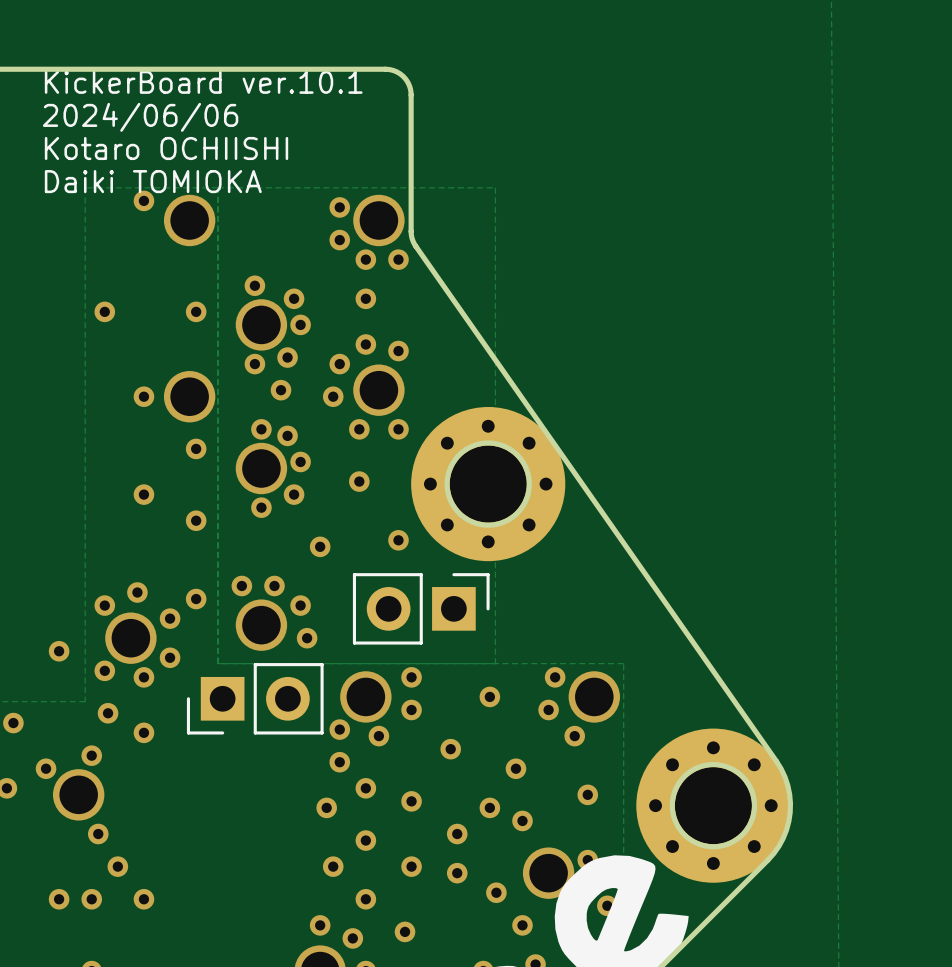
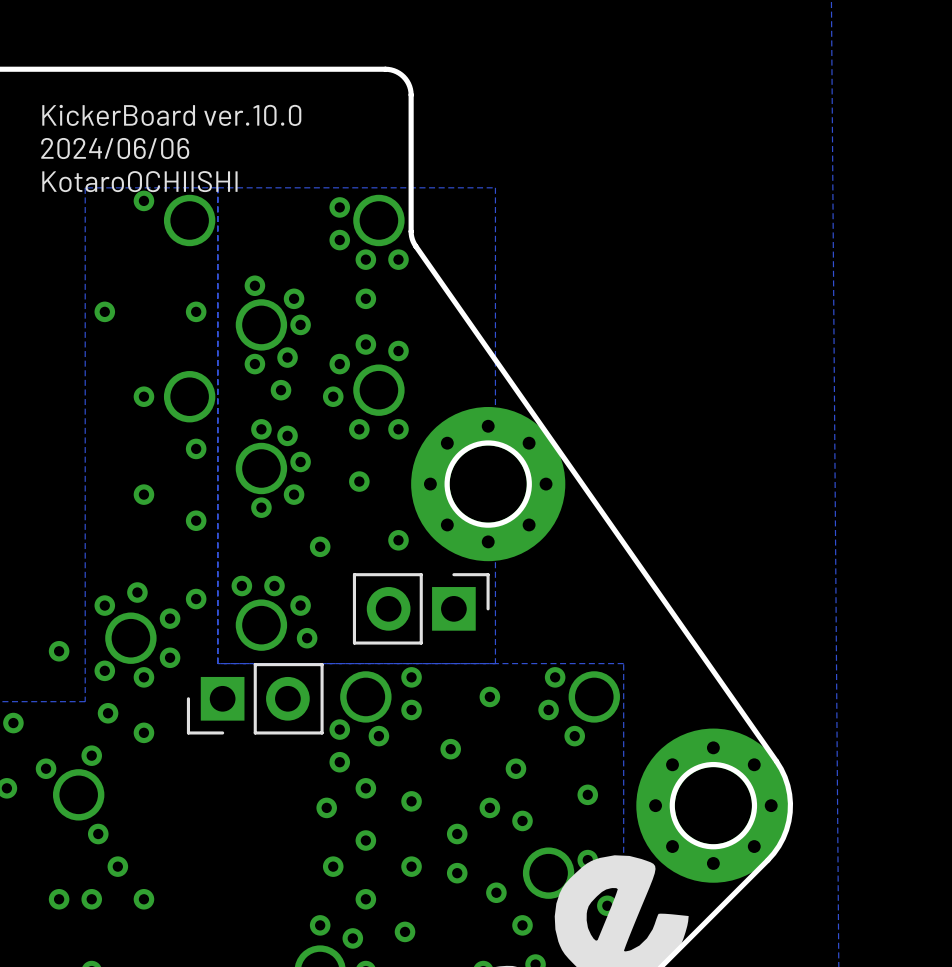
text: KickerBoard ver.10.1 (203, 82) -> none
text: 2024/06/06 (140, 117) -> KickerBoard ver.10.0 (171, 115)
text: Kotaro OCHIISHI (166, 148) -> 2024/06/06 (115, 148)
text: Daiki TOMIOKA (153, 181) -> KotaroOCHIISHI (139, 181)

